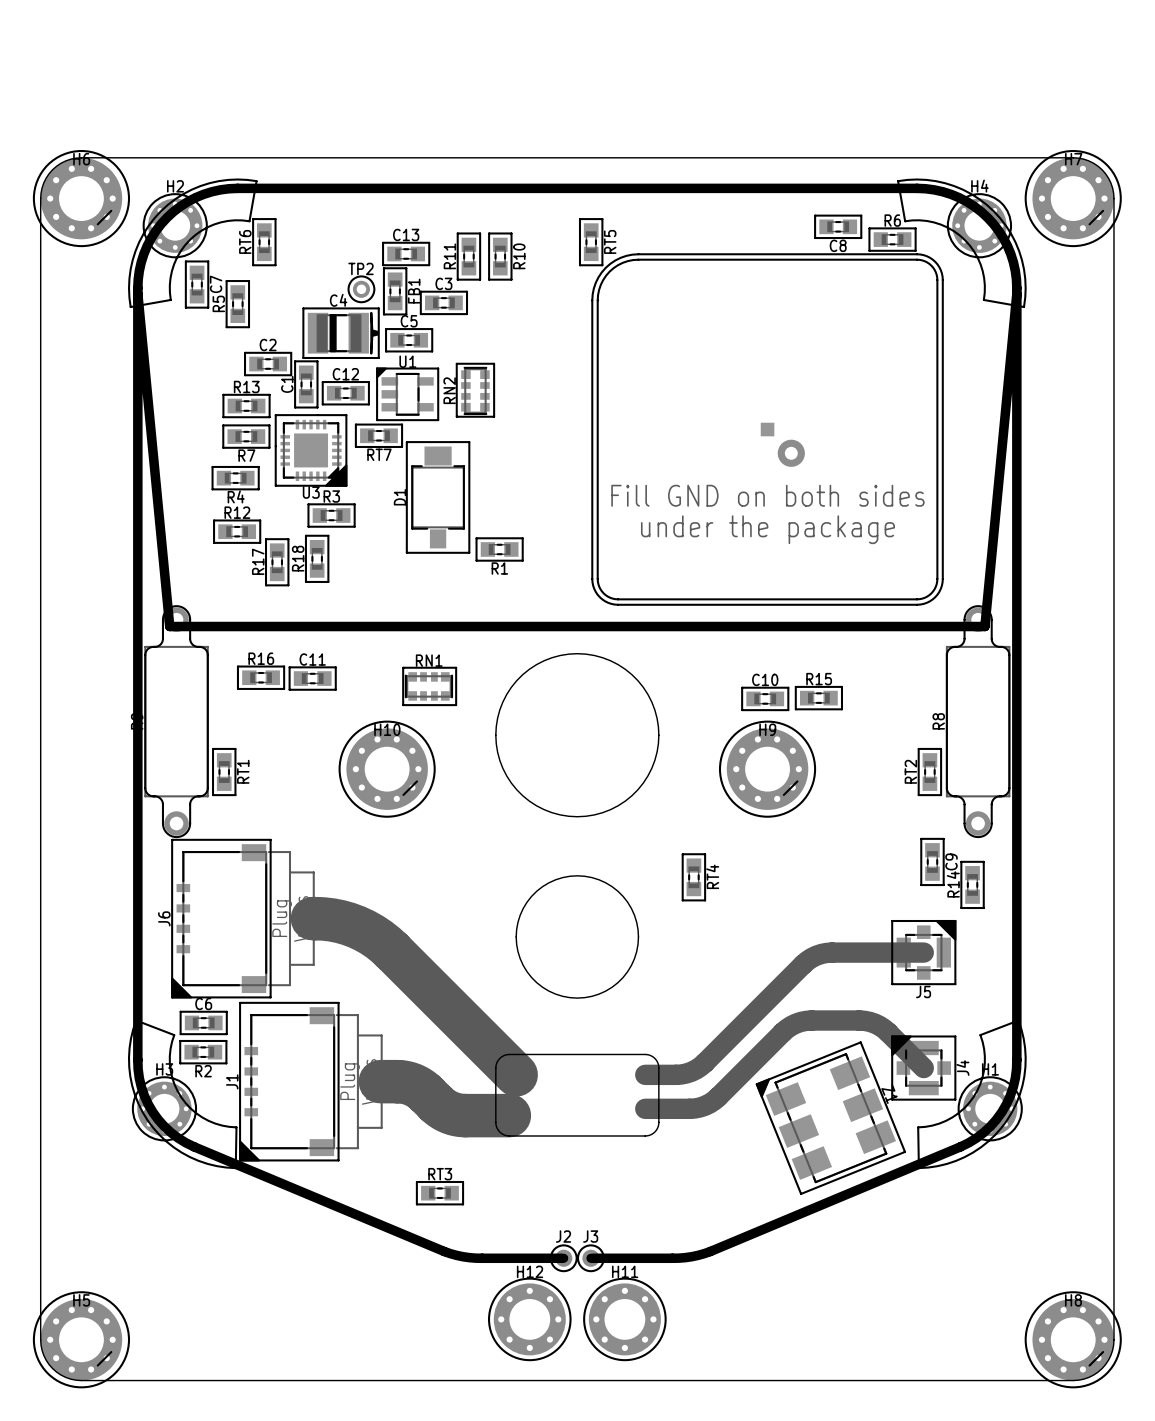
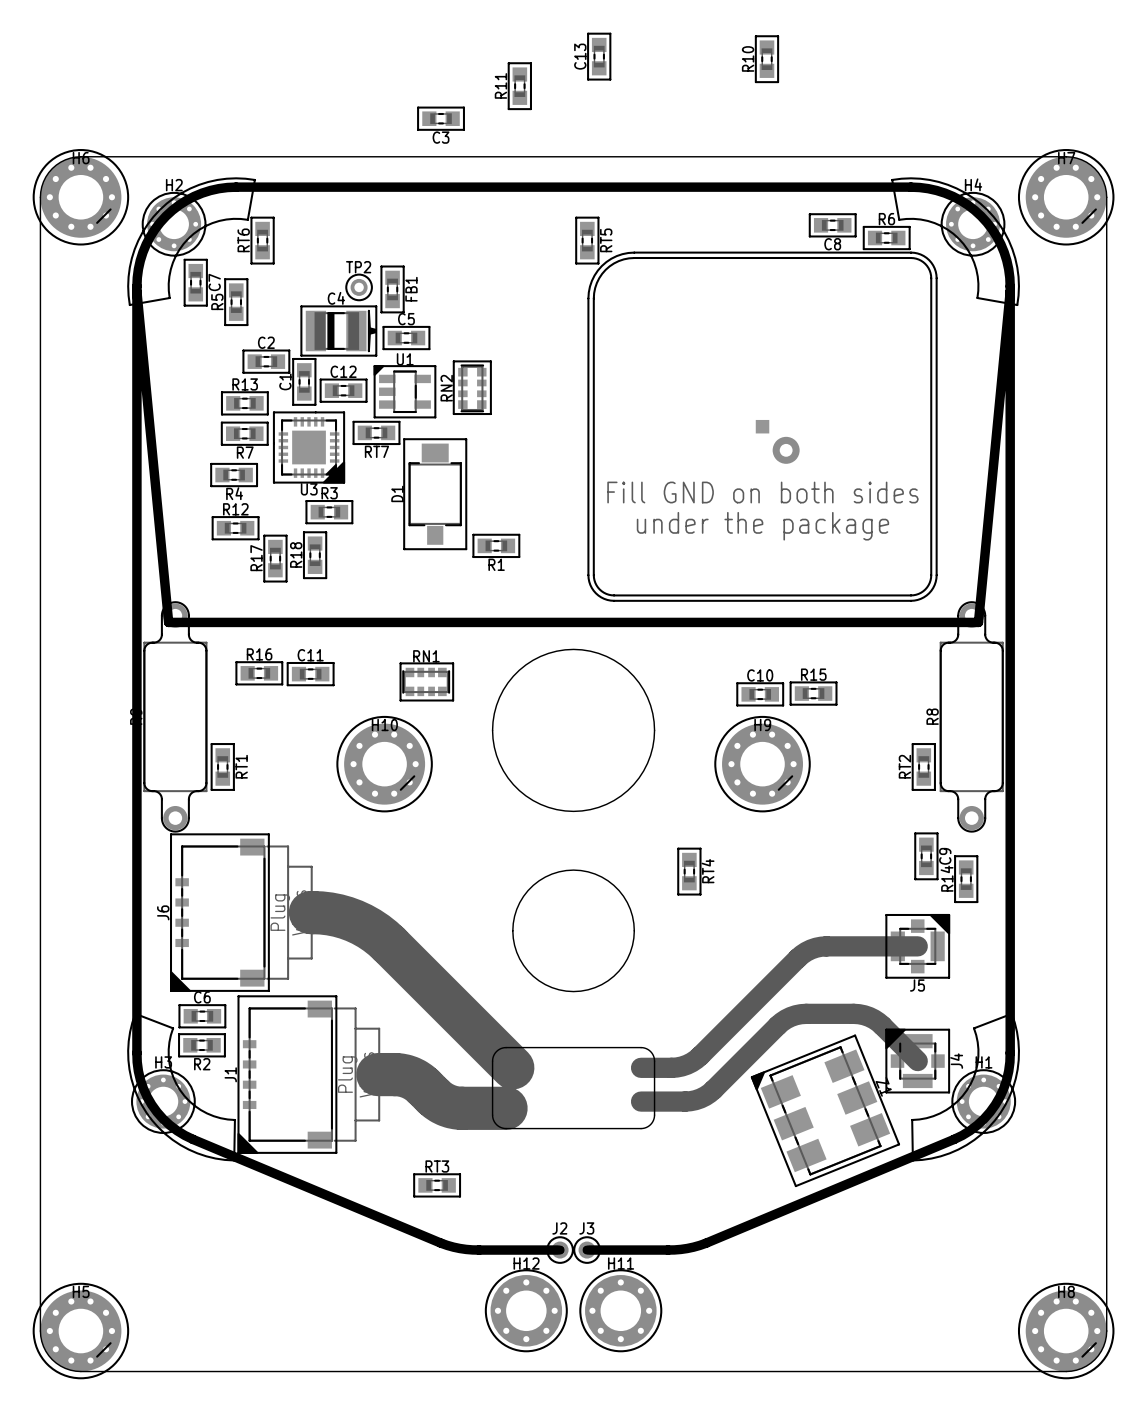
C13 rotation: 0° (406, 253) -> 90° clockwise (599, 56)
C13 position: (406, 253) -> (599, 56)
R11 position: (468, 256) -> (519, 86)
R10 position: (500, 256) -> (766, 59)
R10 name position: R10 (519, 256) -> R10 (748, 58)
C3 name position: C3 (443, 283) -> C3 (441, 137)
C3 position: (443, 302) -> (441, 118)

